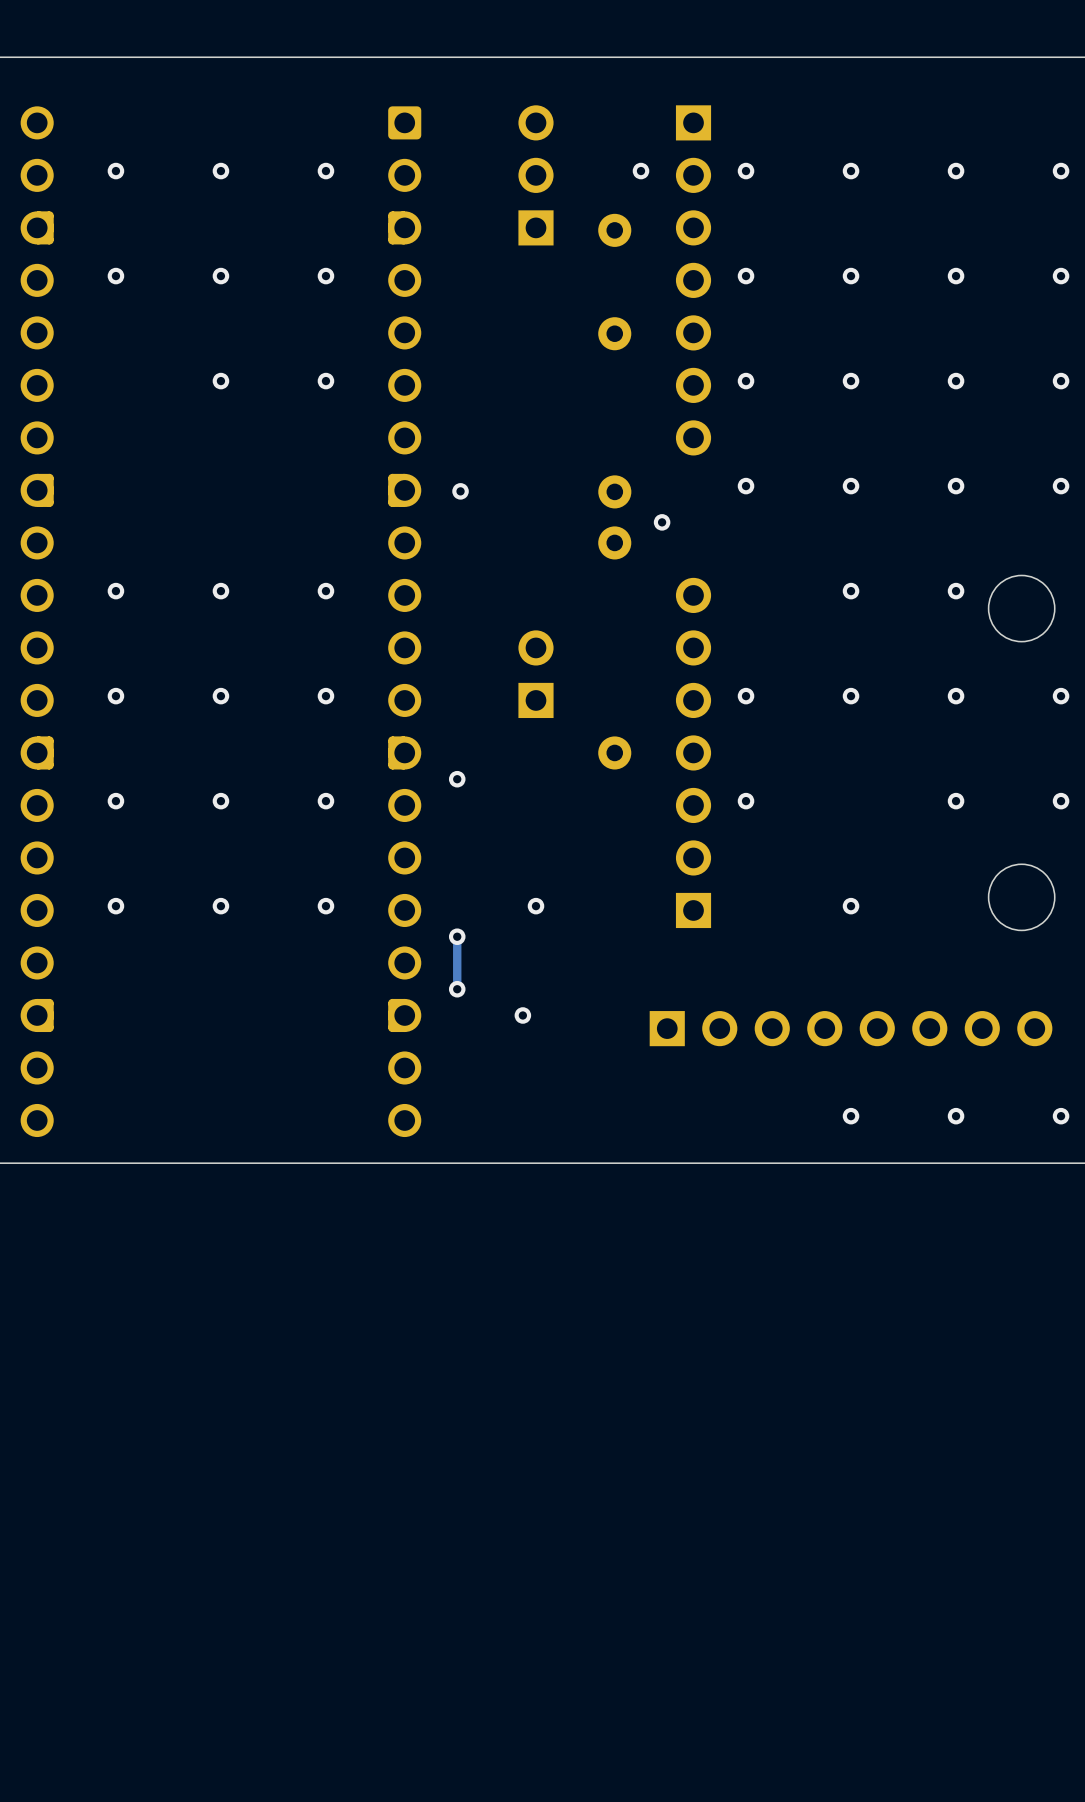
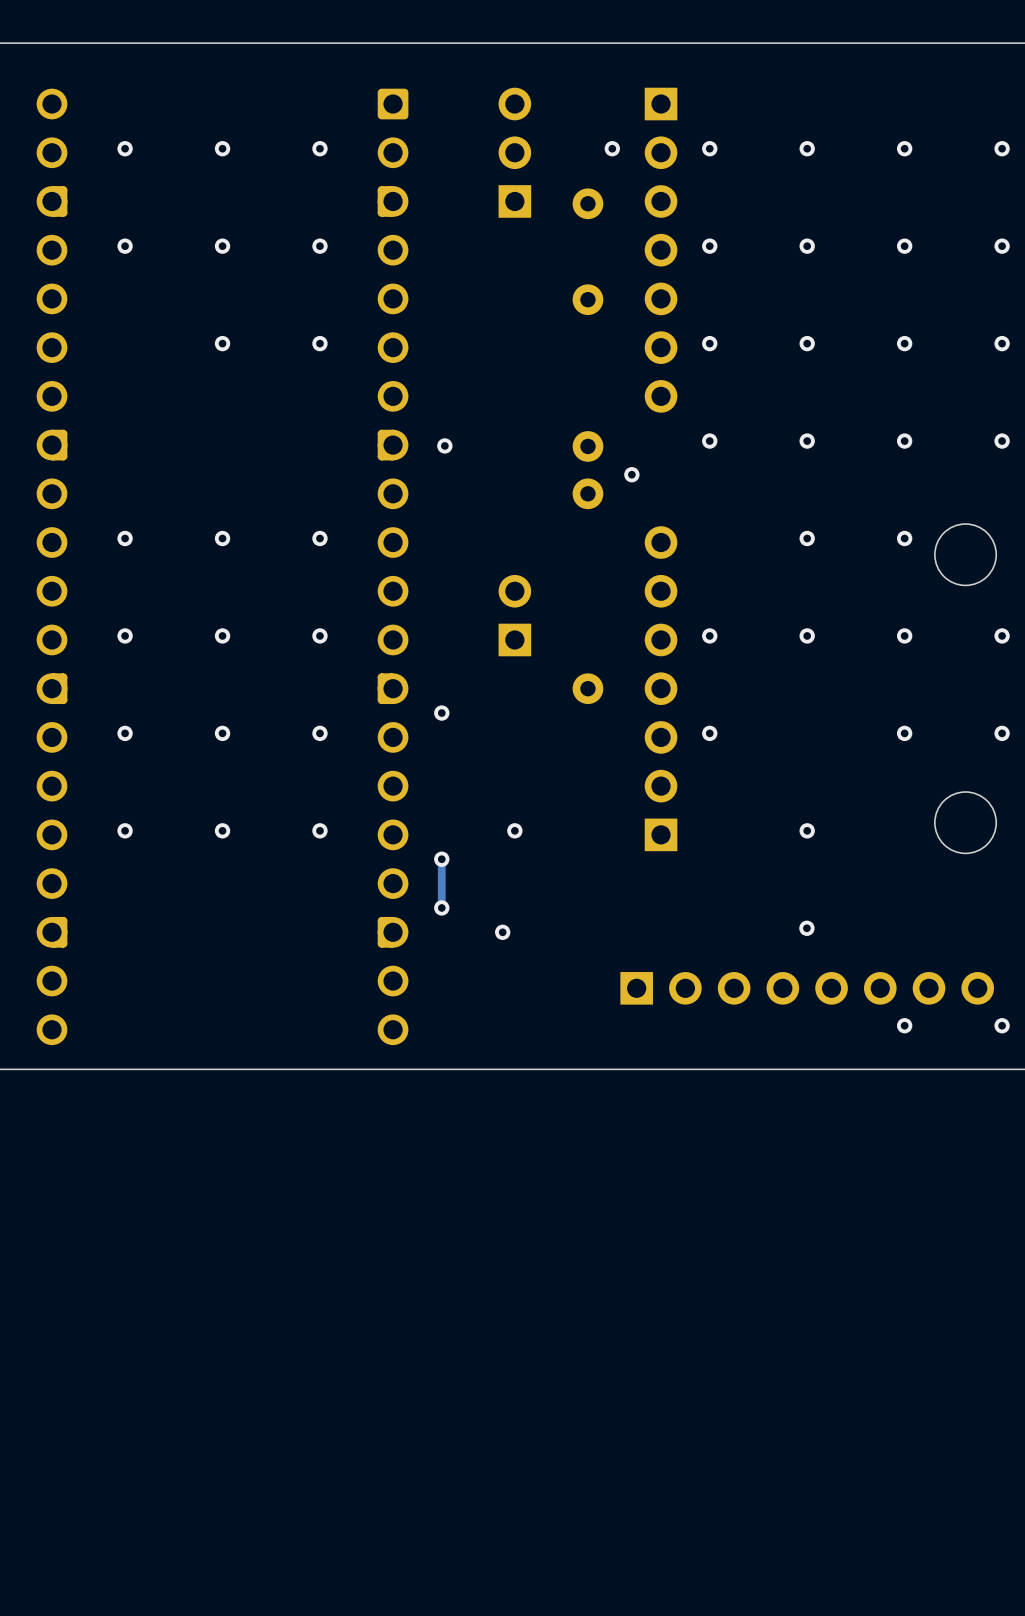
part position: (851, 1028) -> (807, 988)
via position: (851, 1116) -> (806, 928)

